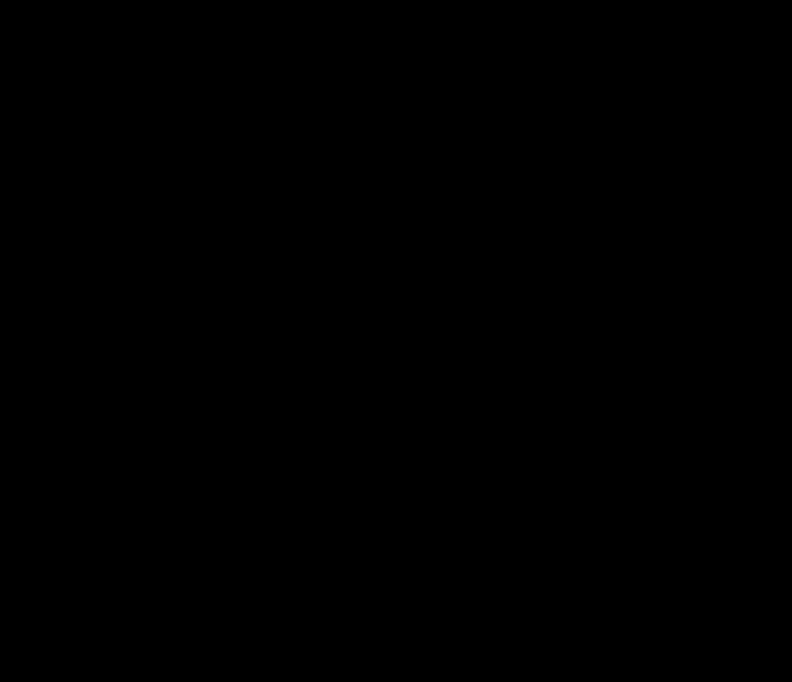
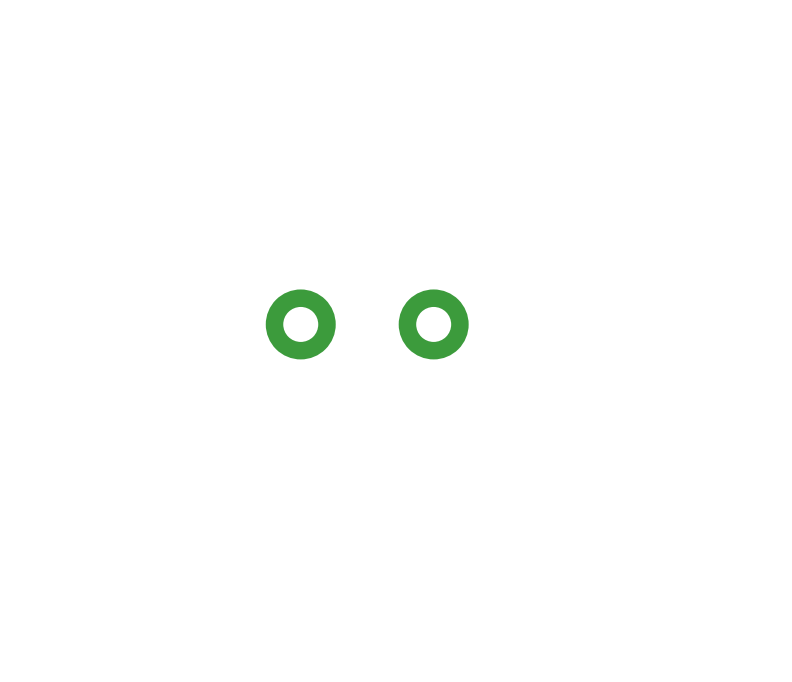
part: none -> (367, 324)

